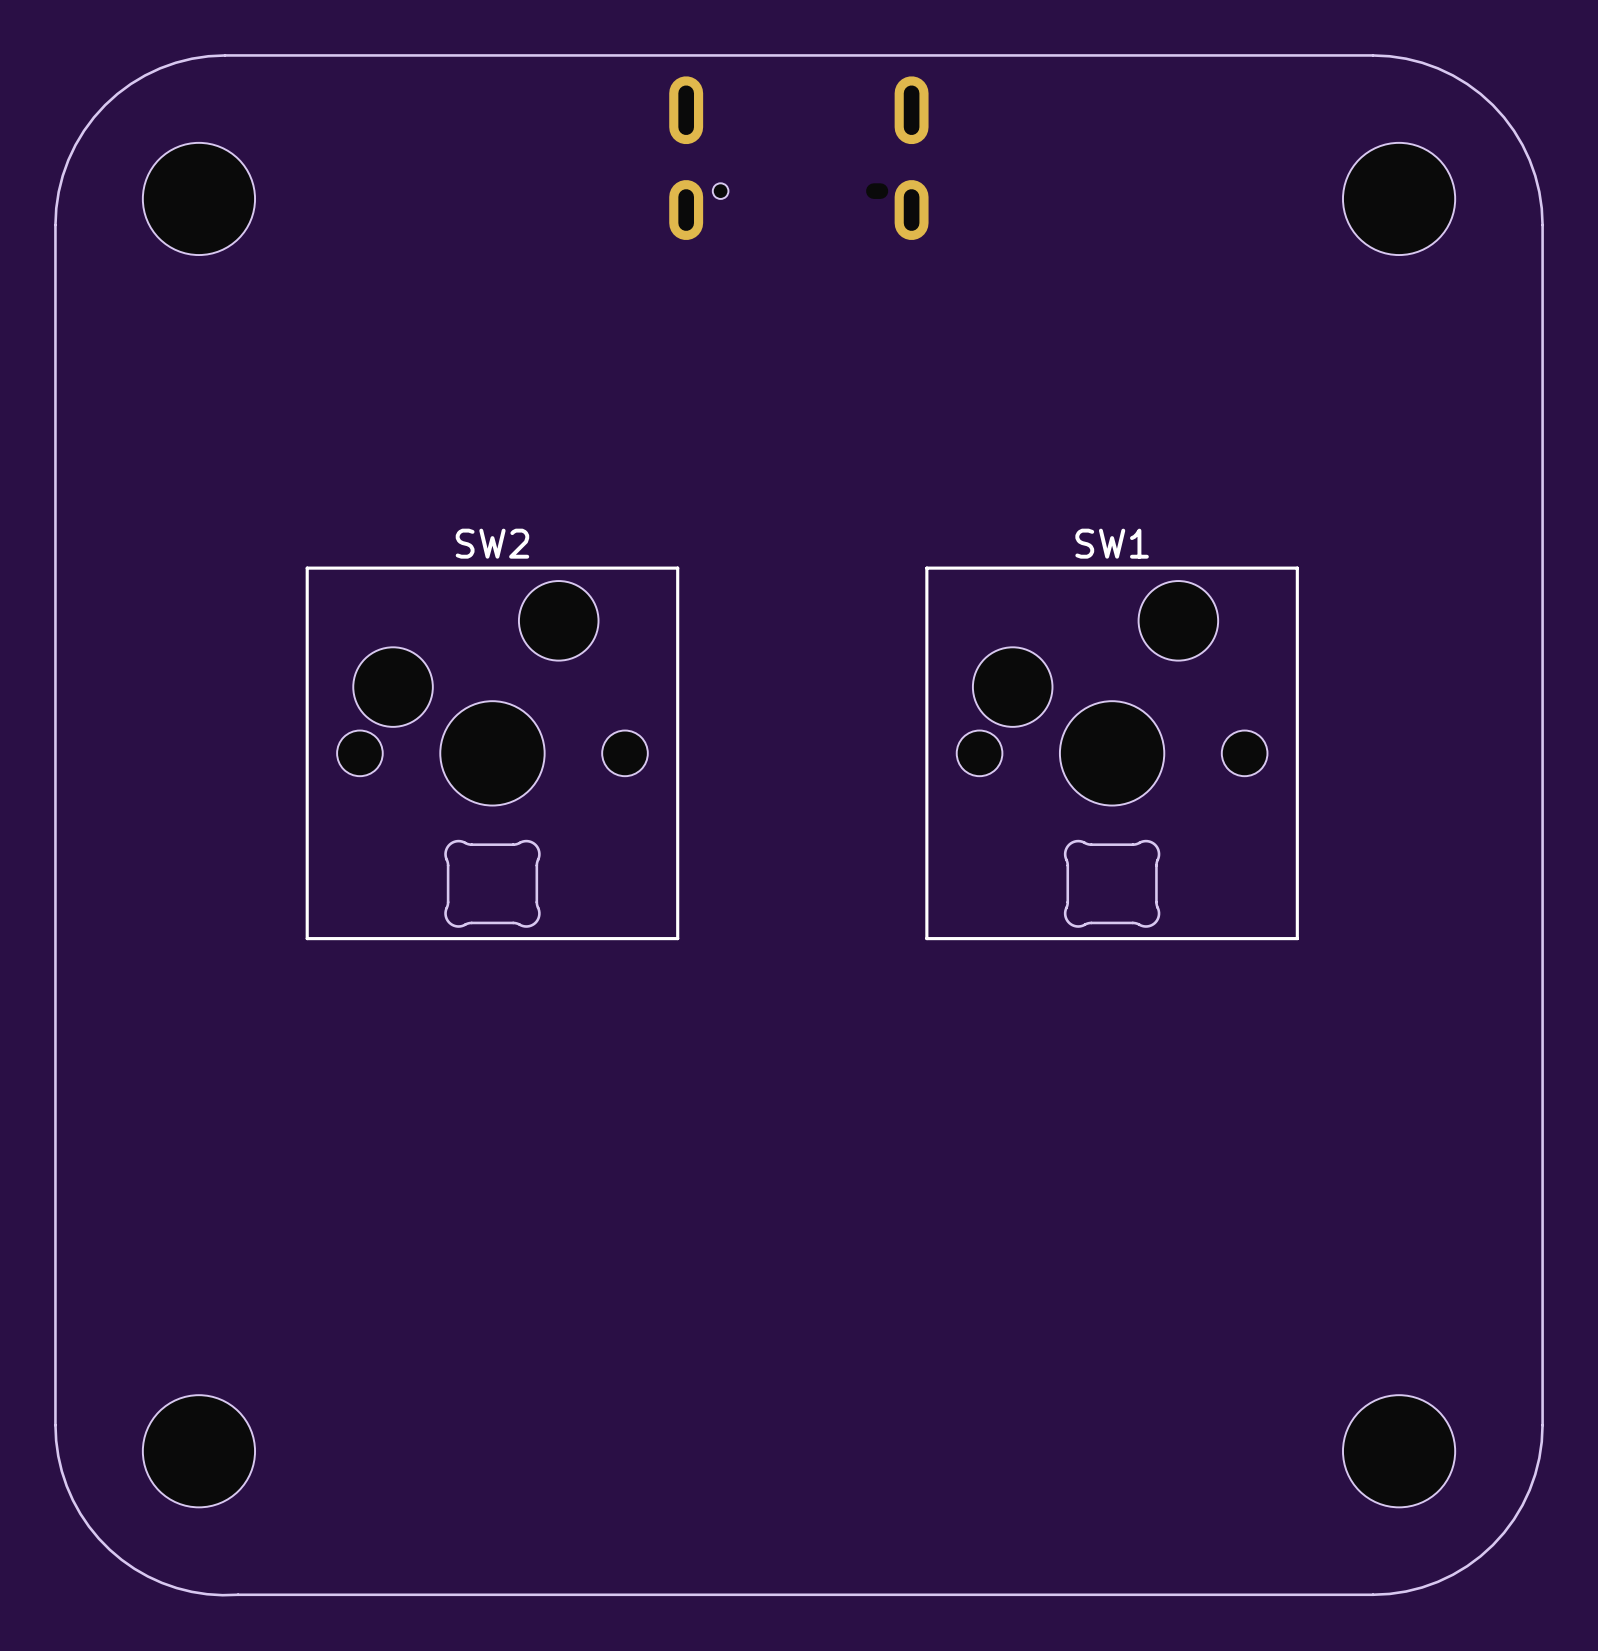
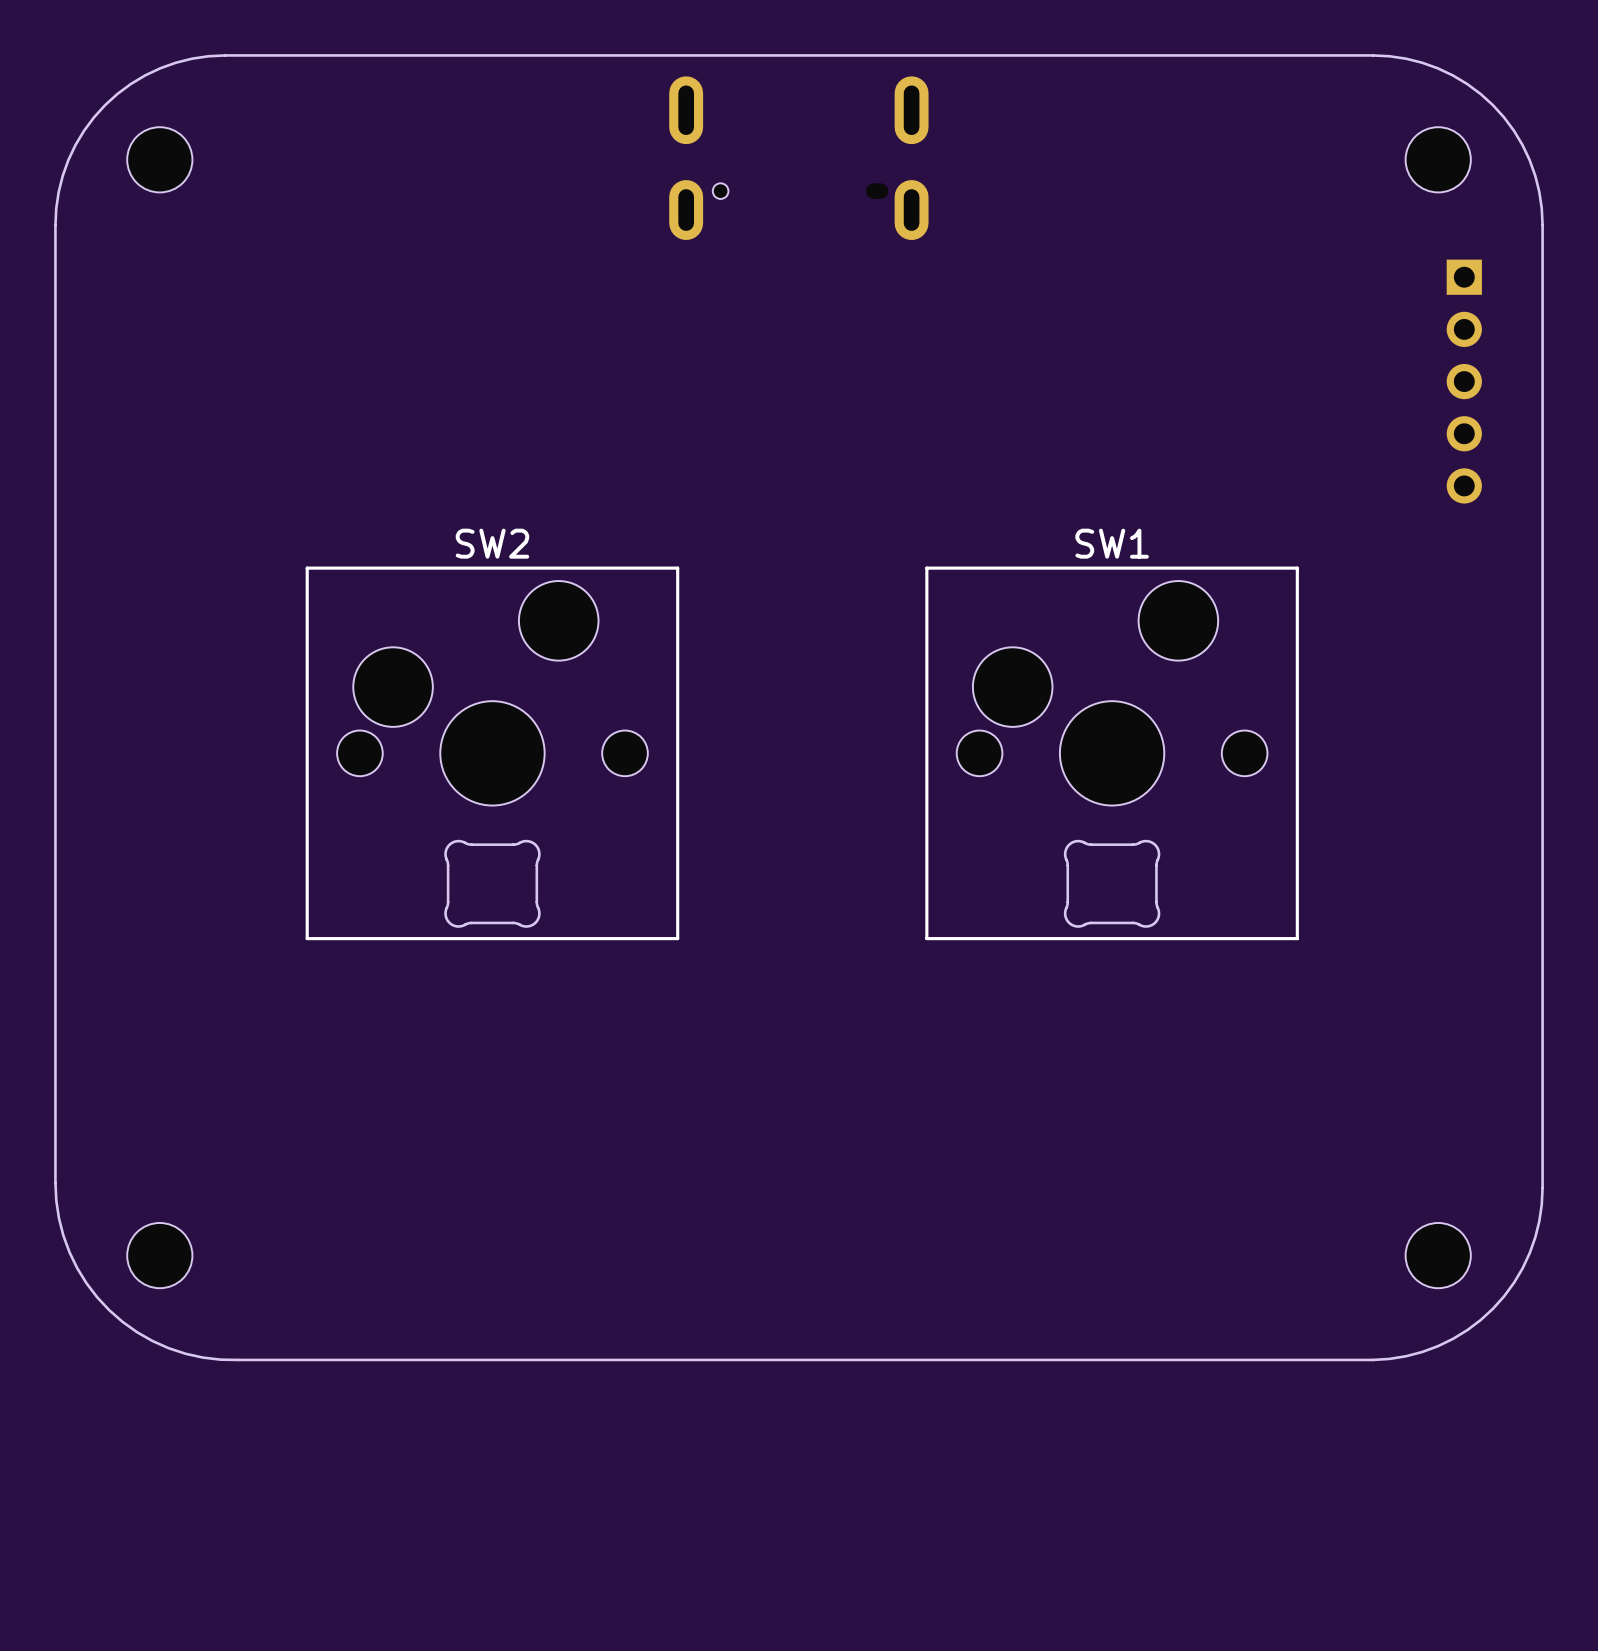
part: none -> (159, 159)
part: none -> (1438, 159)
part: (198, 198) -> none
part: (1399, 198) -> none
part: none -> (1464, 381)
board edge: (55, 1183) (55, 1425) (58, 1456) (66, 1485) (89, 1526) (109, 1549) (134, 1568) (176, 1588) (222, 1595) (1372, 1594) (1406, 1591) (1422, 1587) (1437, 1581) (1467, 1566) (1492, 1545) (1514, 1519) (1522, 1505) (1535, 1474) (1541, 1441) (1542, 1425) (1542, 1187) -> (55, 1183) (58, 1218) (69, 1252) (86, 1283) (109, 1310) (137, 1332) (168, 1348) (202, 1357) (238, 1359) (1389, 1358) (1422, 1351) (1453, 1338) (1480, 1319) (1504, 1296) (1522, 1268) (1529, 1253) (1539, 1221) (1542, 1187)
part: none -> (159, 1255)
part: none -> (1438, 1255)
part: (198, 1451) -> none
part: (1399, 1451) -> none

